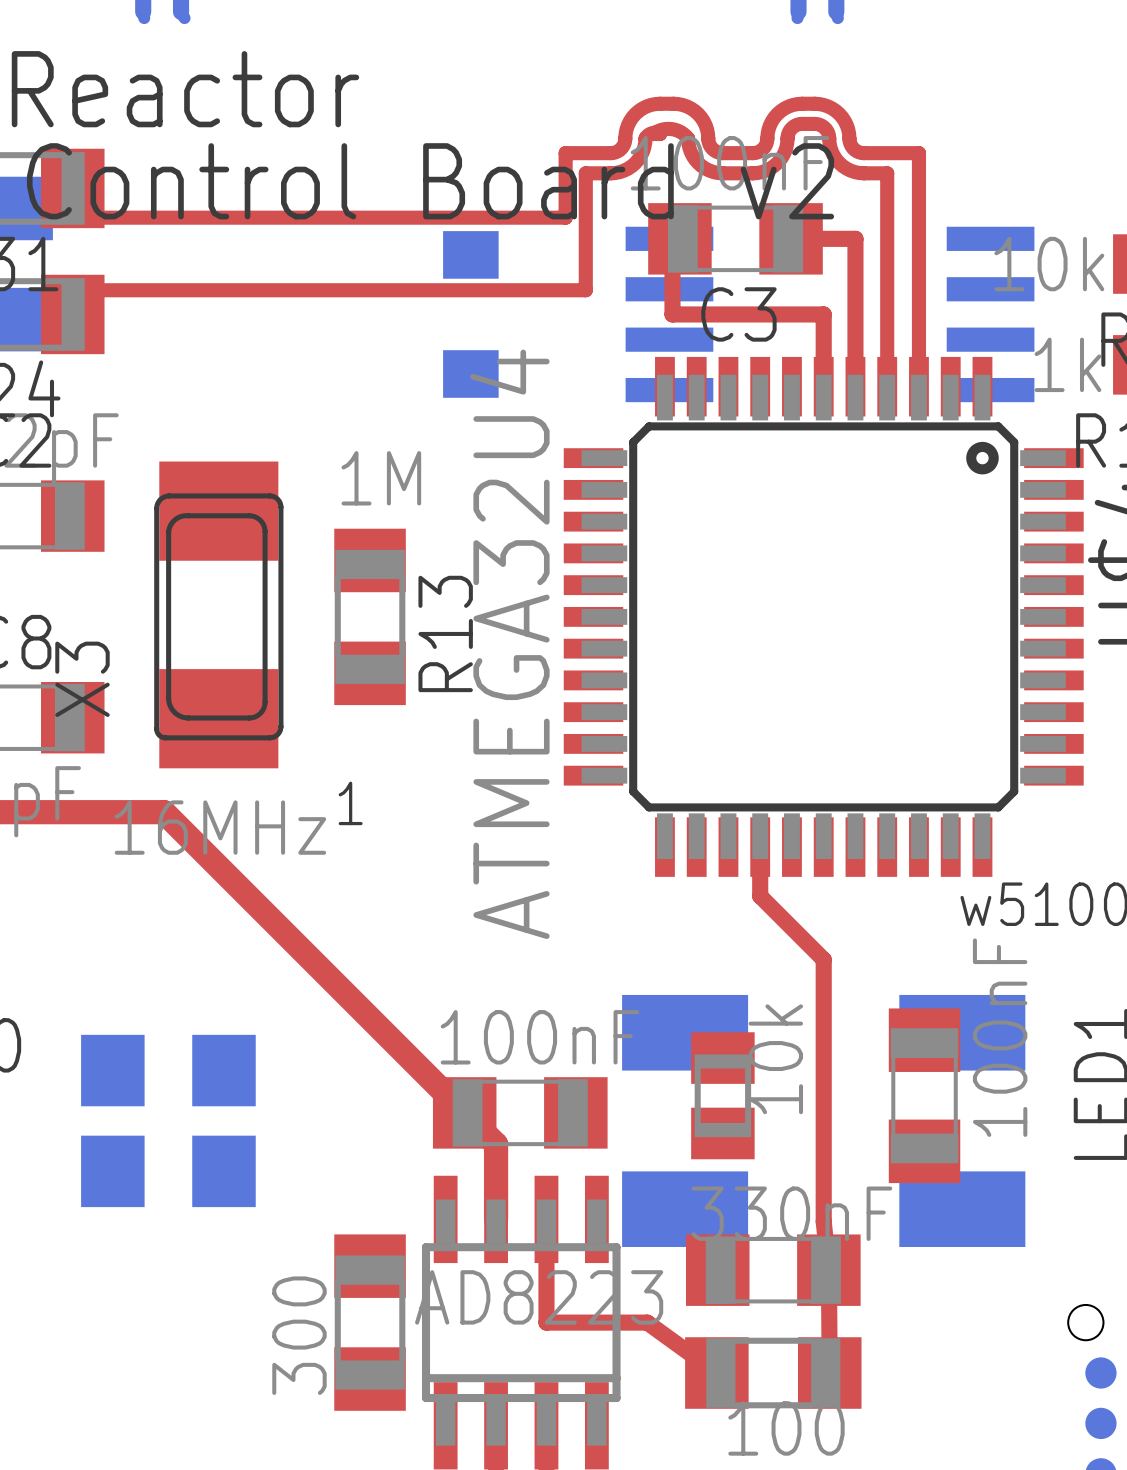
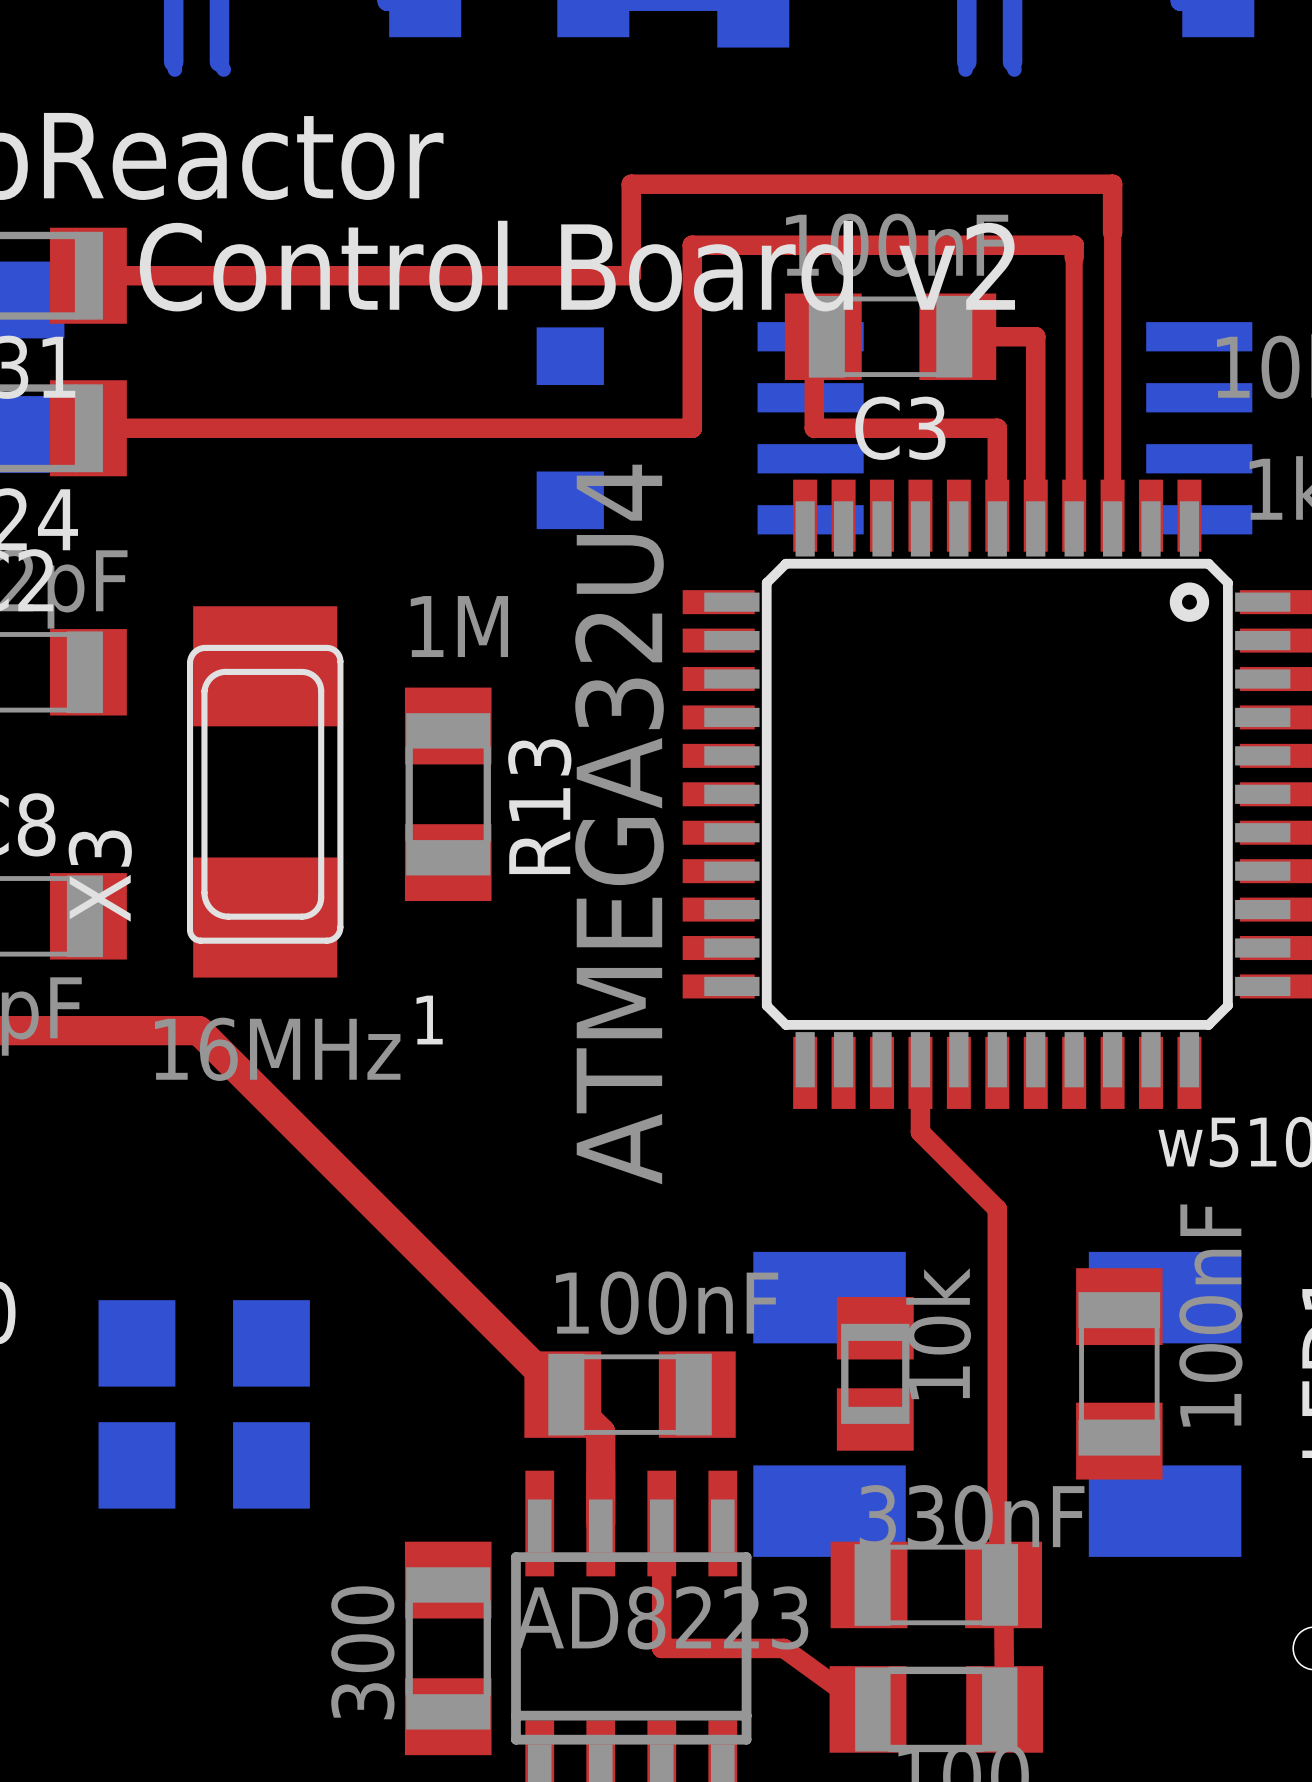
top track: (918, 153) (858, 152) (851, 145) (846, 125) (839, 113) (827, 106) (814, 103) (793, 104) (780, 110) (772, 121) (766, 144) (760, 151) (752, 153) (720, 153) (710, 145) (705, 125) (694, 110) (682, 104) (660, 103) (646, 106) (635, 113) (627, 125) (624, 144) (618, 151) (610, 153) (565, 153) (565, 217) (72, 217) (72, 188) -> (1112, 233) (1112, 184) (631, 184) (631, 275) (88, 275)
top track: (887, 173) (859, 173) (842, 166) (831, 151) (827, 131) (818, 124) (800, 124) (793, 126) (788, 132) (786, 147) (780, 159) (766, 170) (752, 173) (718, 173) (705, 168) (692, 155) (685, 136) (674, 129) (665, 129) (658, 130) (656, 132) (653, 134) (660, 134) (657, 133) (656, 132) (654, 132) (653, 132) (647, 136) (640, 155) (628, 168) (615, 173) (585, 173) (585, 290) (72, 290) (72, 314) -> (1074, 257) (1074, 245) (692, 245) (692, 428) (88, 428)

